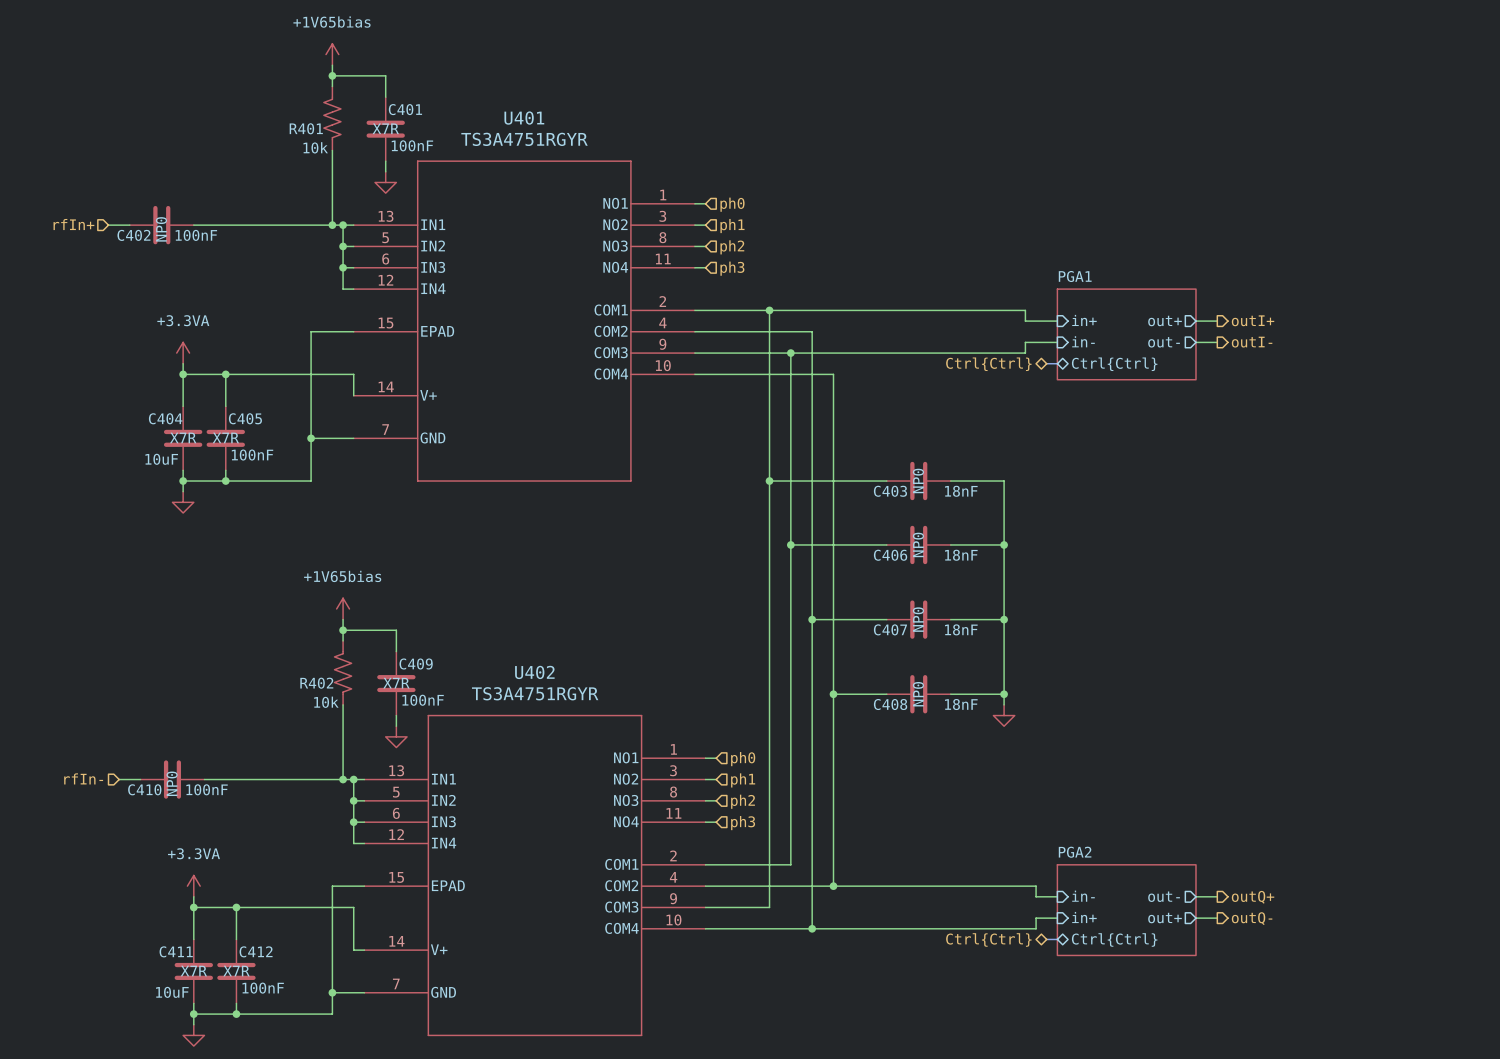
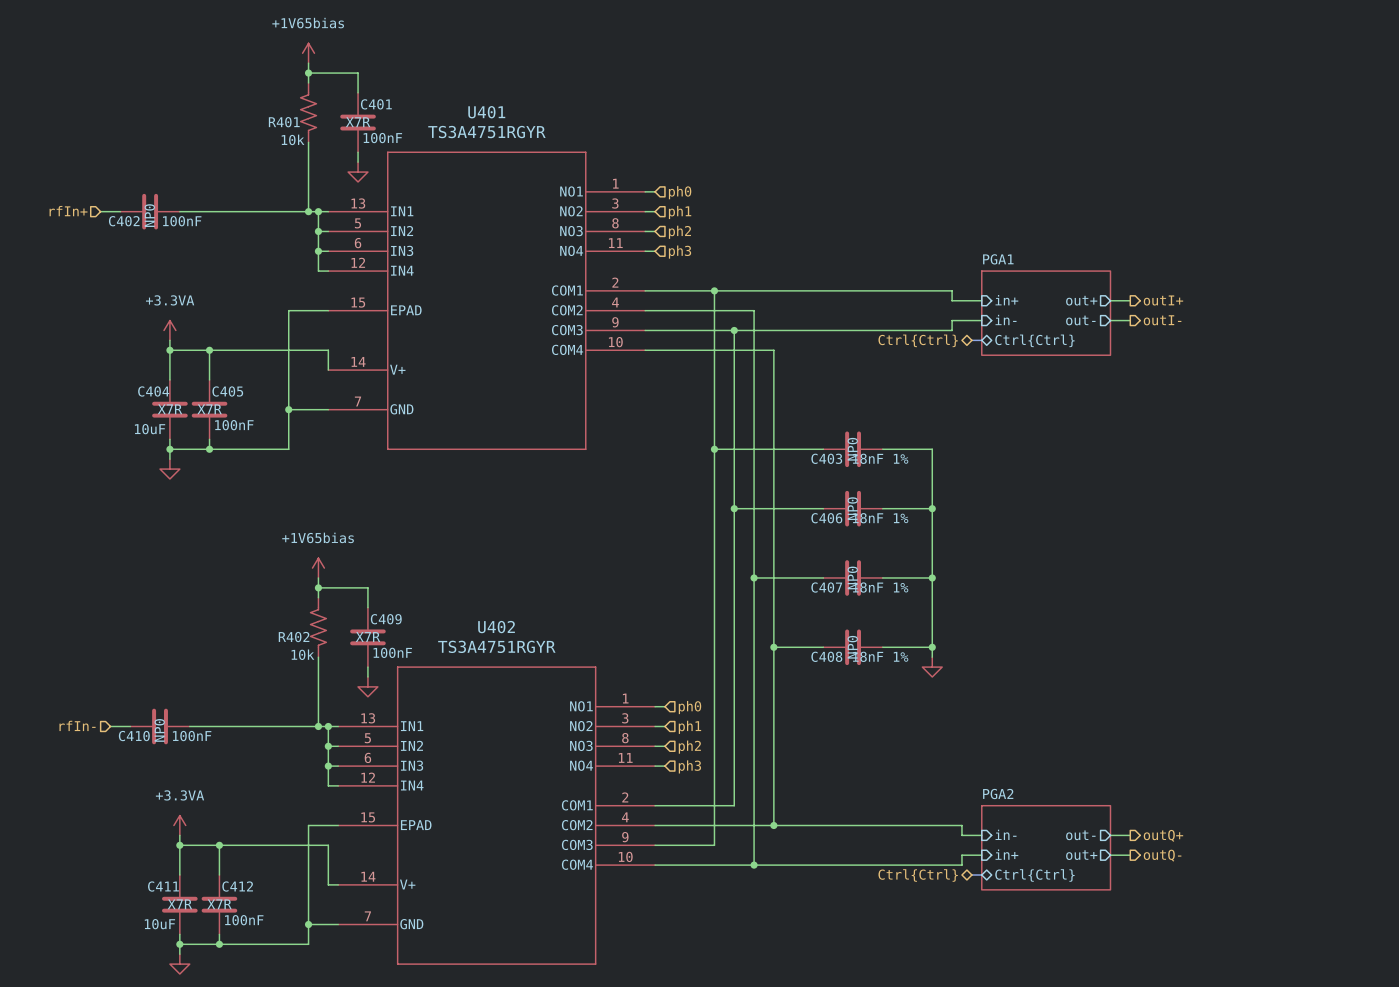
C403 value: 18nF (961, 491) -> 18nF 1% (880, 458)
C406 value: 18nF (961, 555) -> 18nF 1% (880, 518)
C407 value: 18nF (961, 629) -> 18nF 1% (880, 587)
C408 value: 18nF (961, 704) -> 18nF 1% (880, 656)

